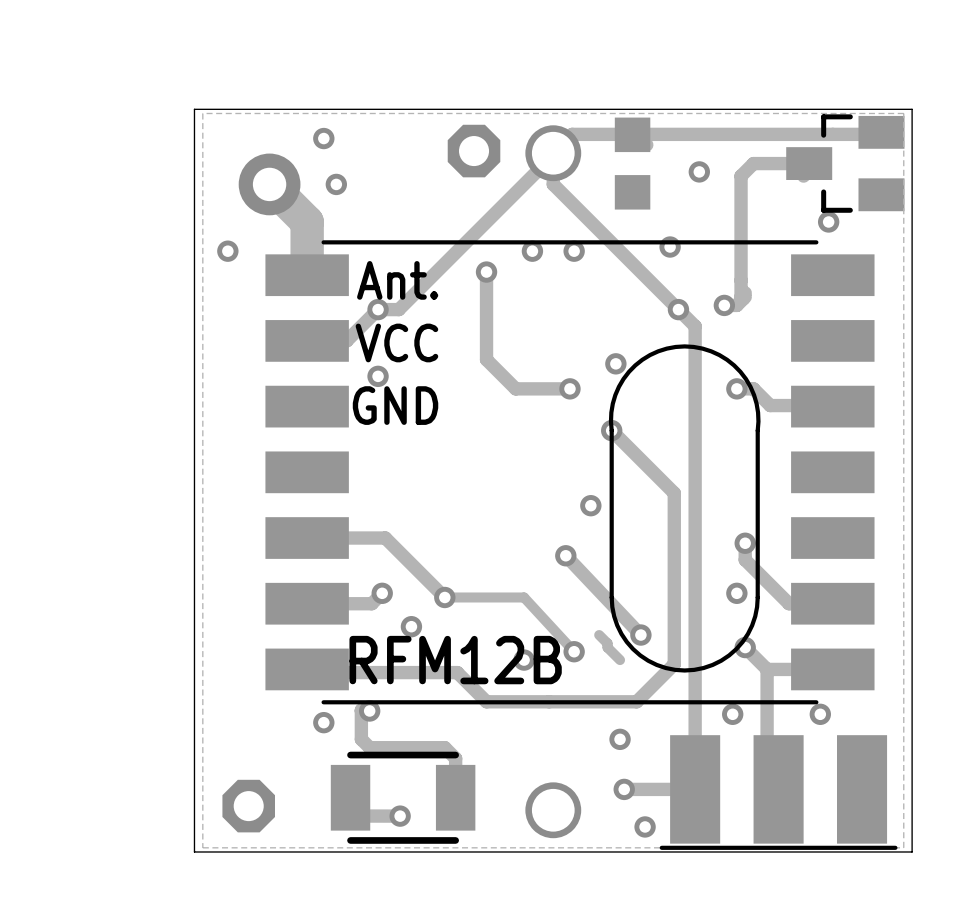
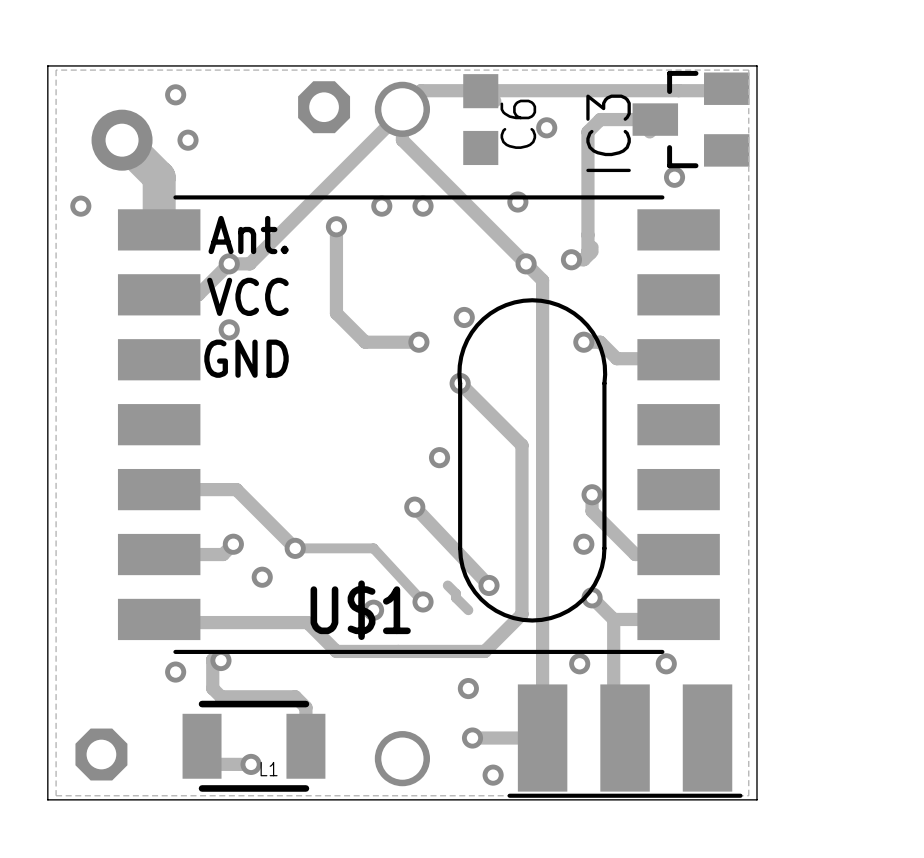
C6 name: none -> C6 (518, 124)
IC3 name: none -> IC3 (608, 133)
RFM12B name: RFM12B (455, 660) -> U$1 (360, 610)
L1 name: none -> L1 (269, 769)

